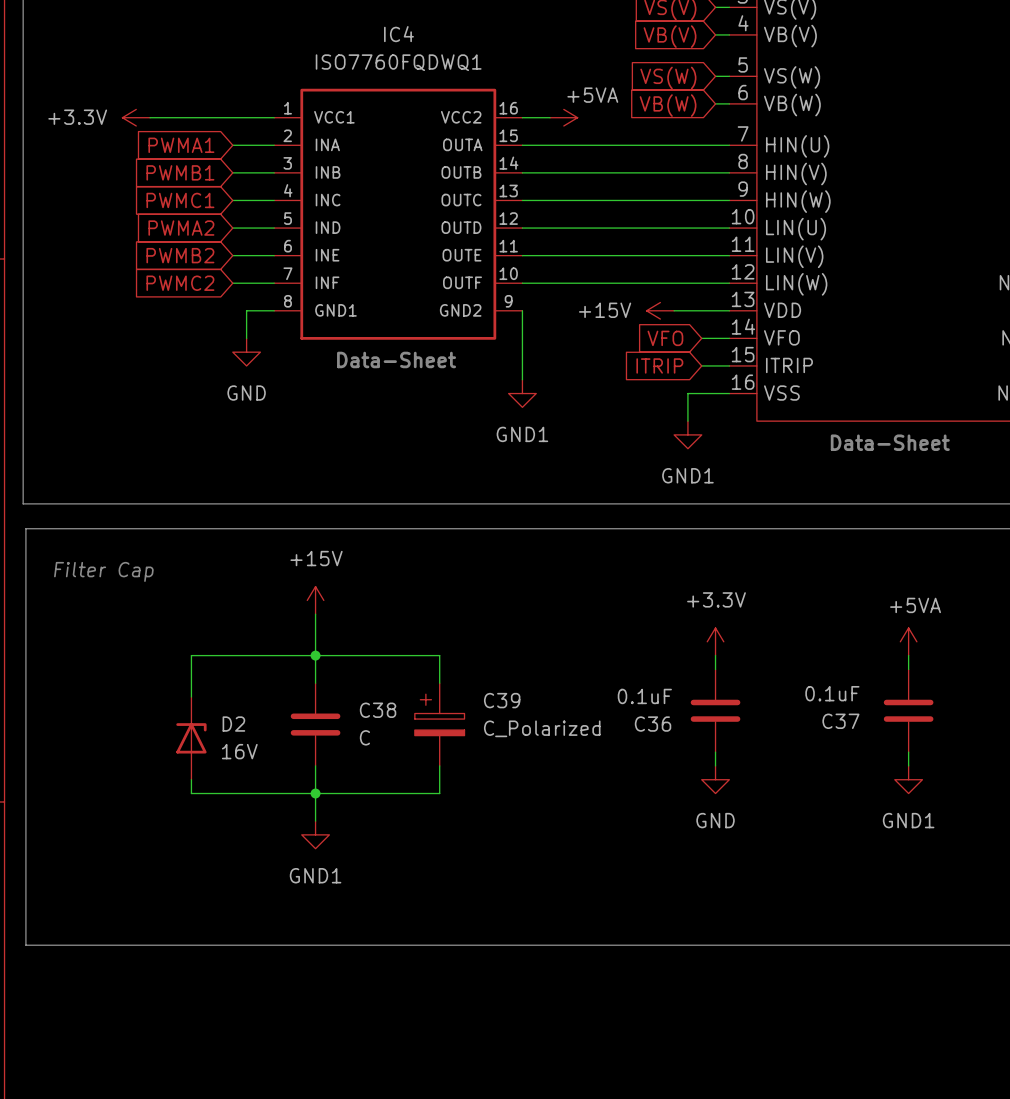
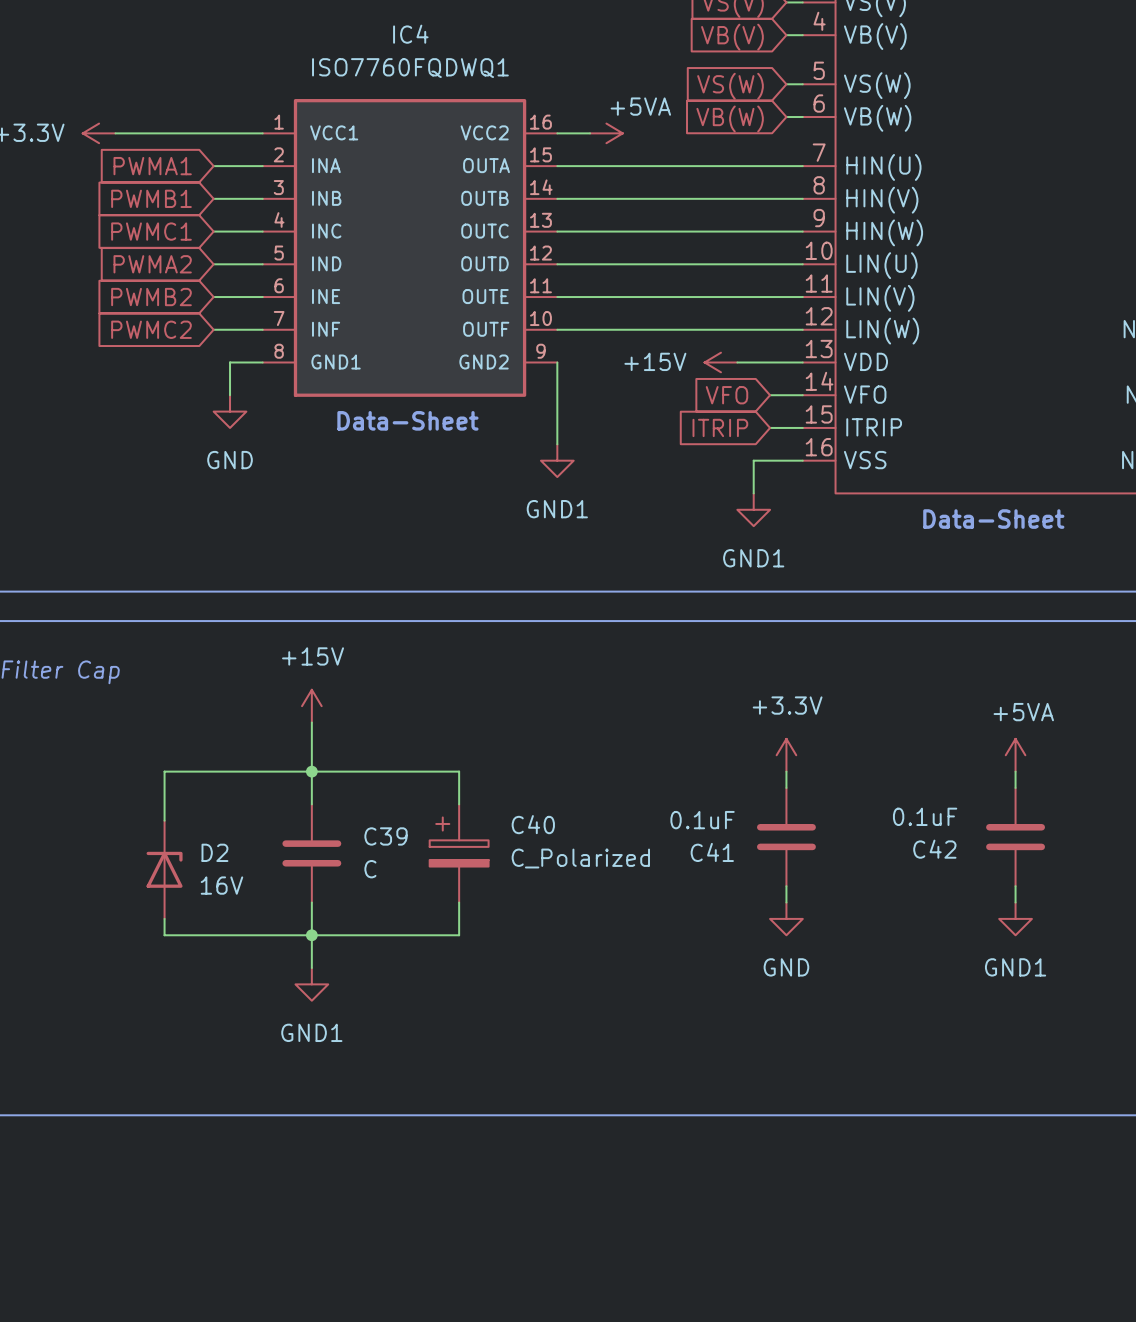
C39 name: C39 (502, 700) -> C40 (533, 824)
C38 name: C38 (378, 710) -> C39 (386, 836)
C37 name: C37 (840, 721) -> C42 (934, 849)
C36 name: C36 (653, 724) -> C41 (712, 852)

